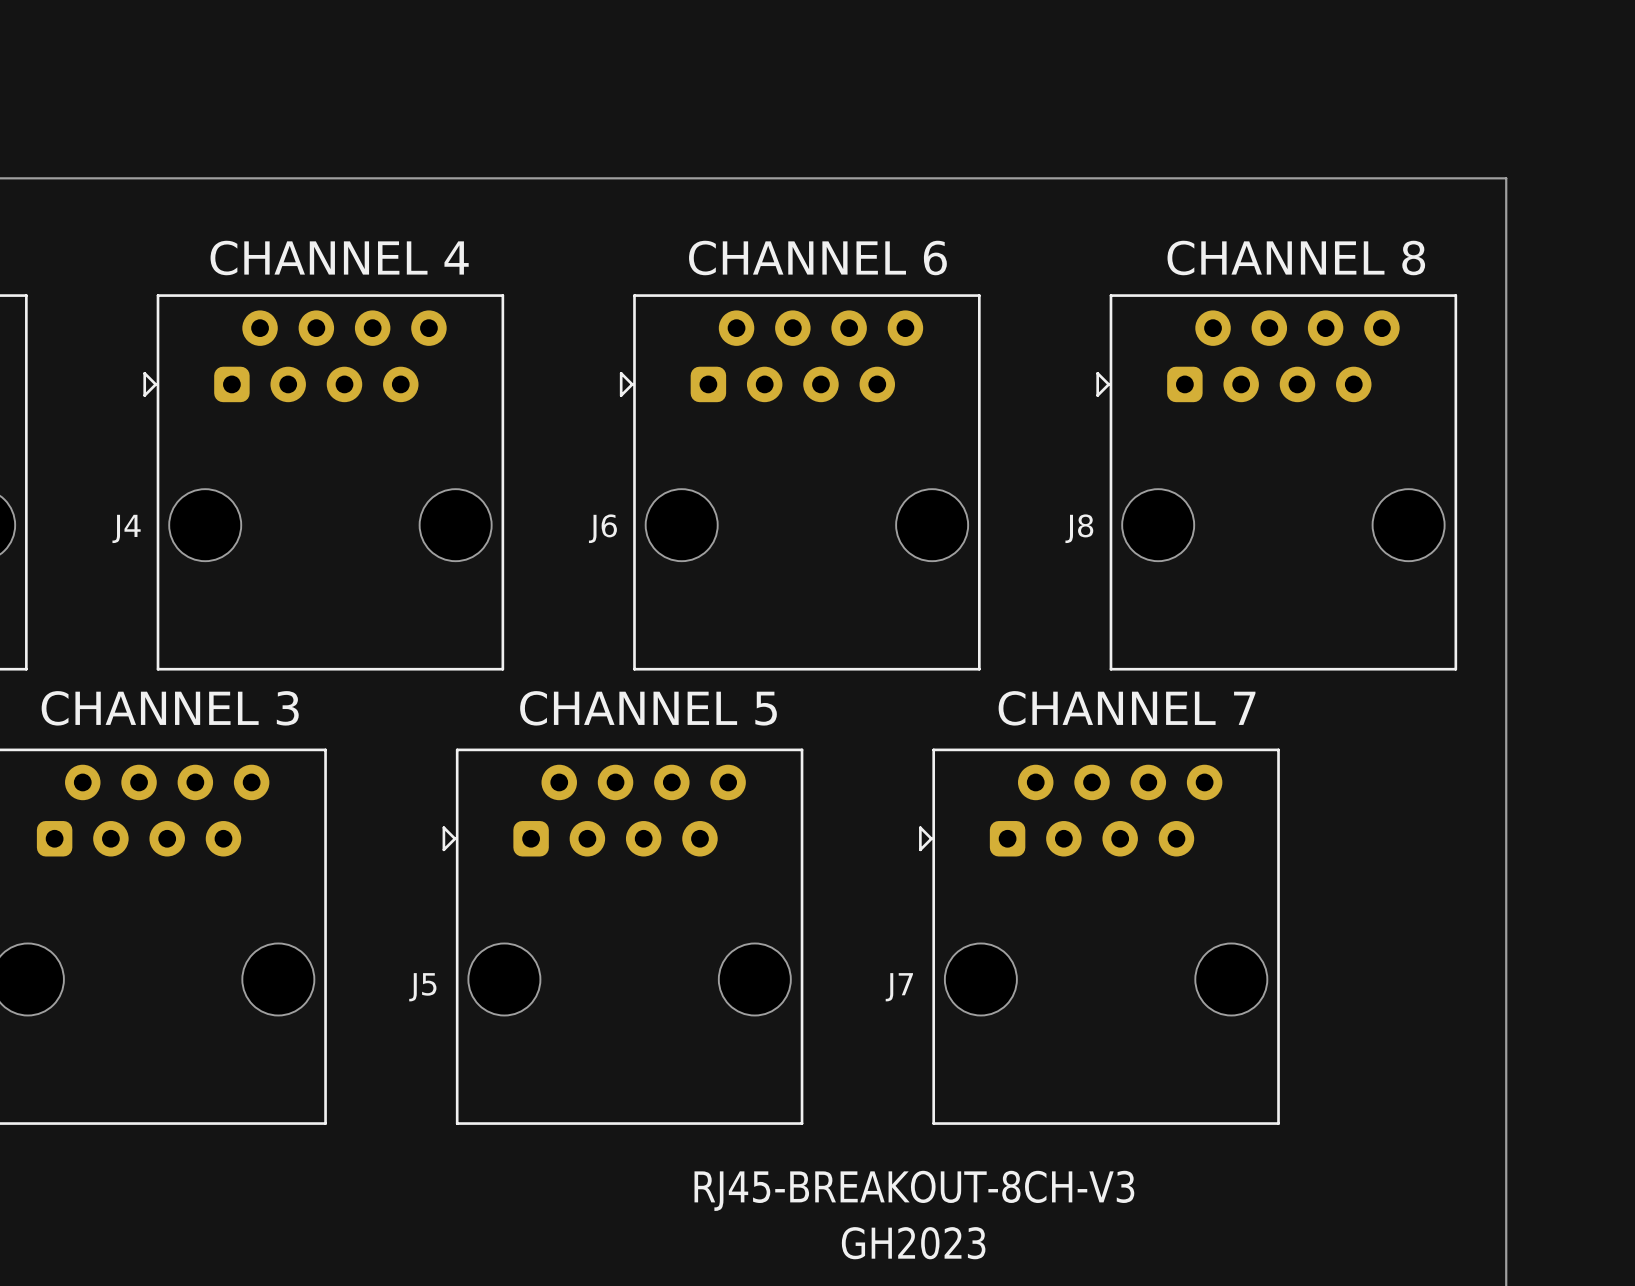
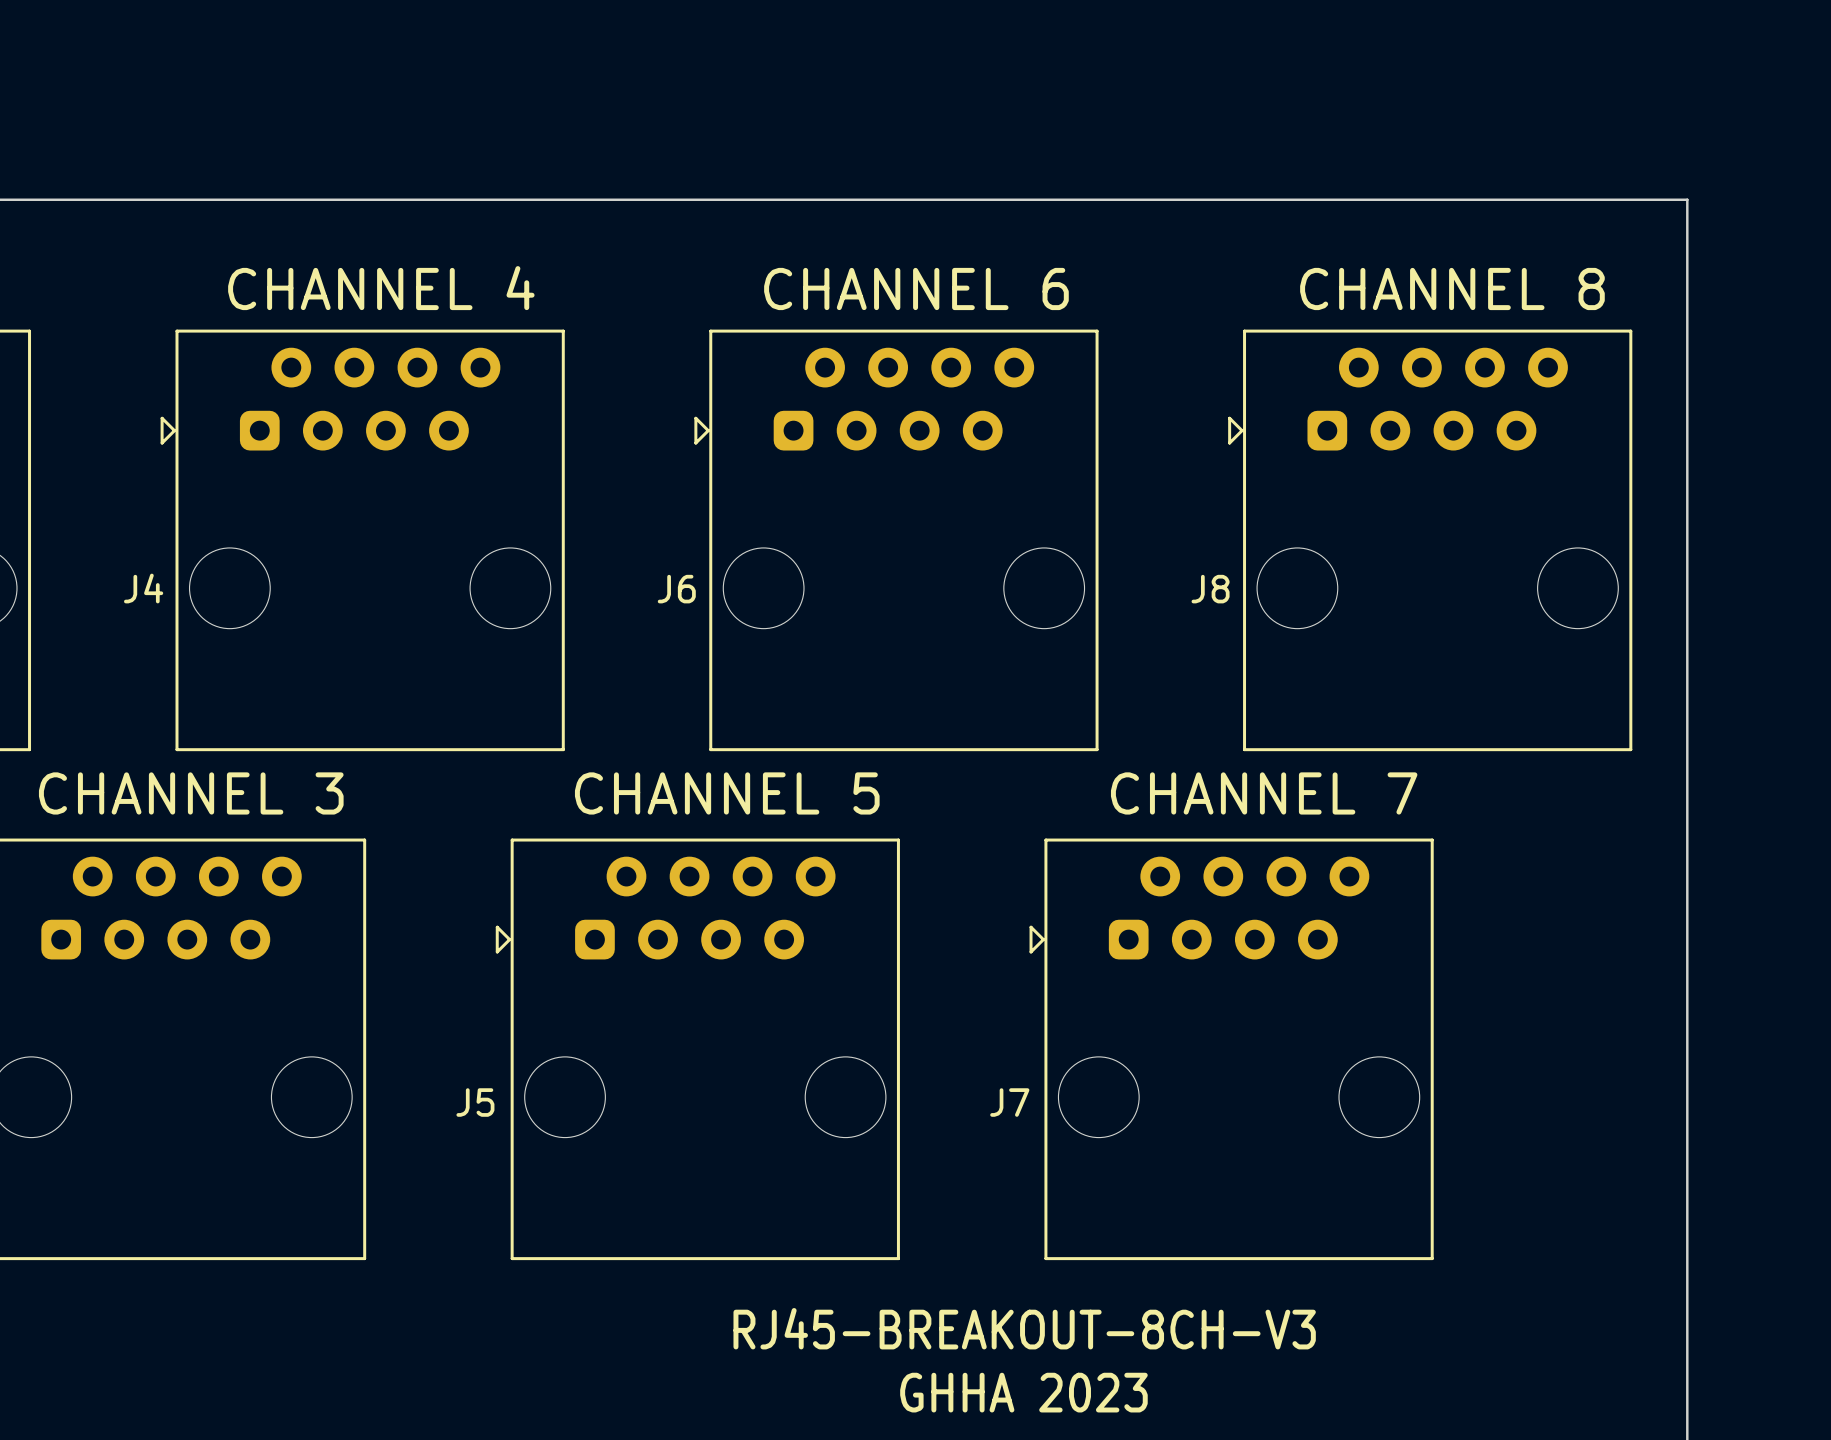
text: GH2023 (913, 1243) -> GHHA 2023 (1023, 1392)

